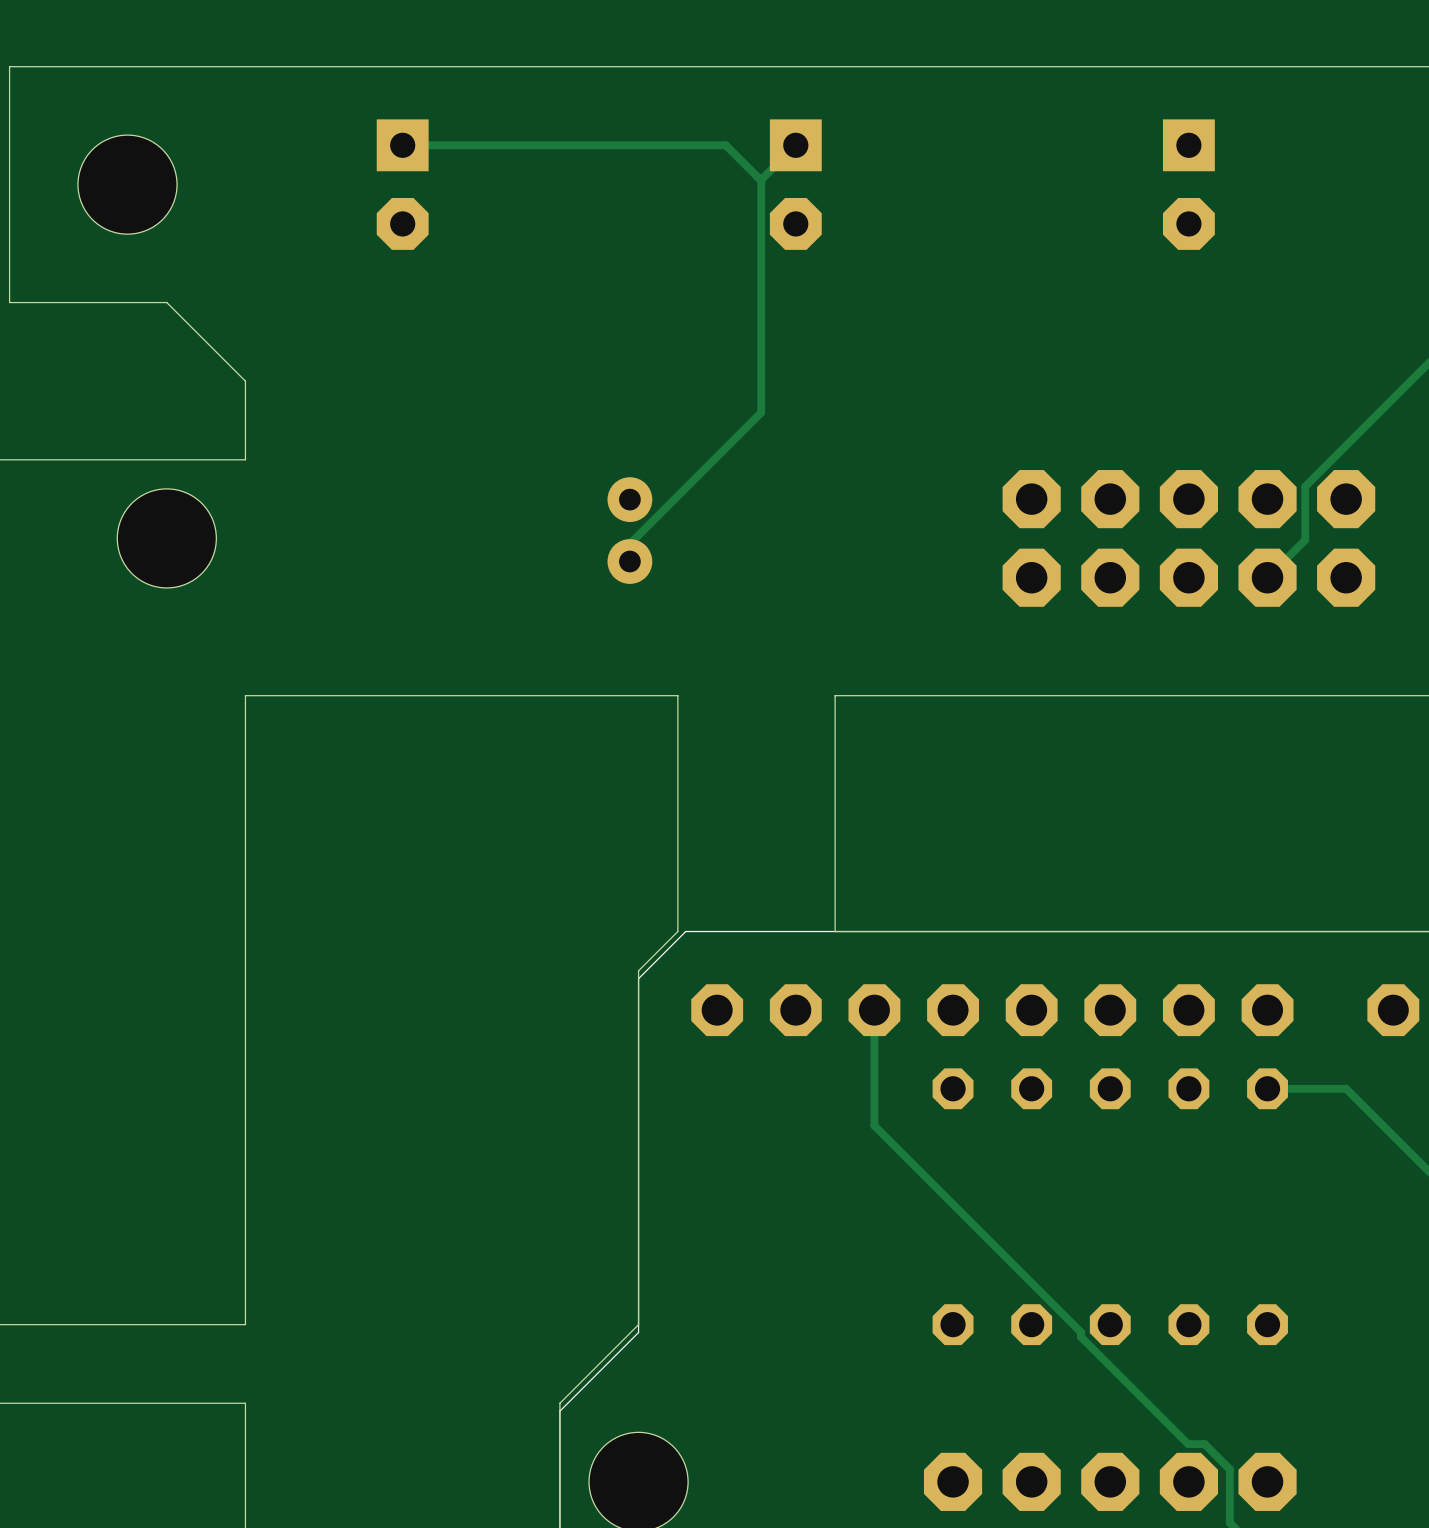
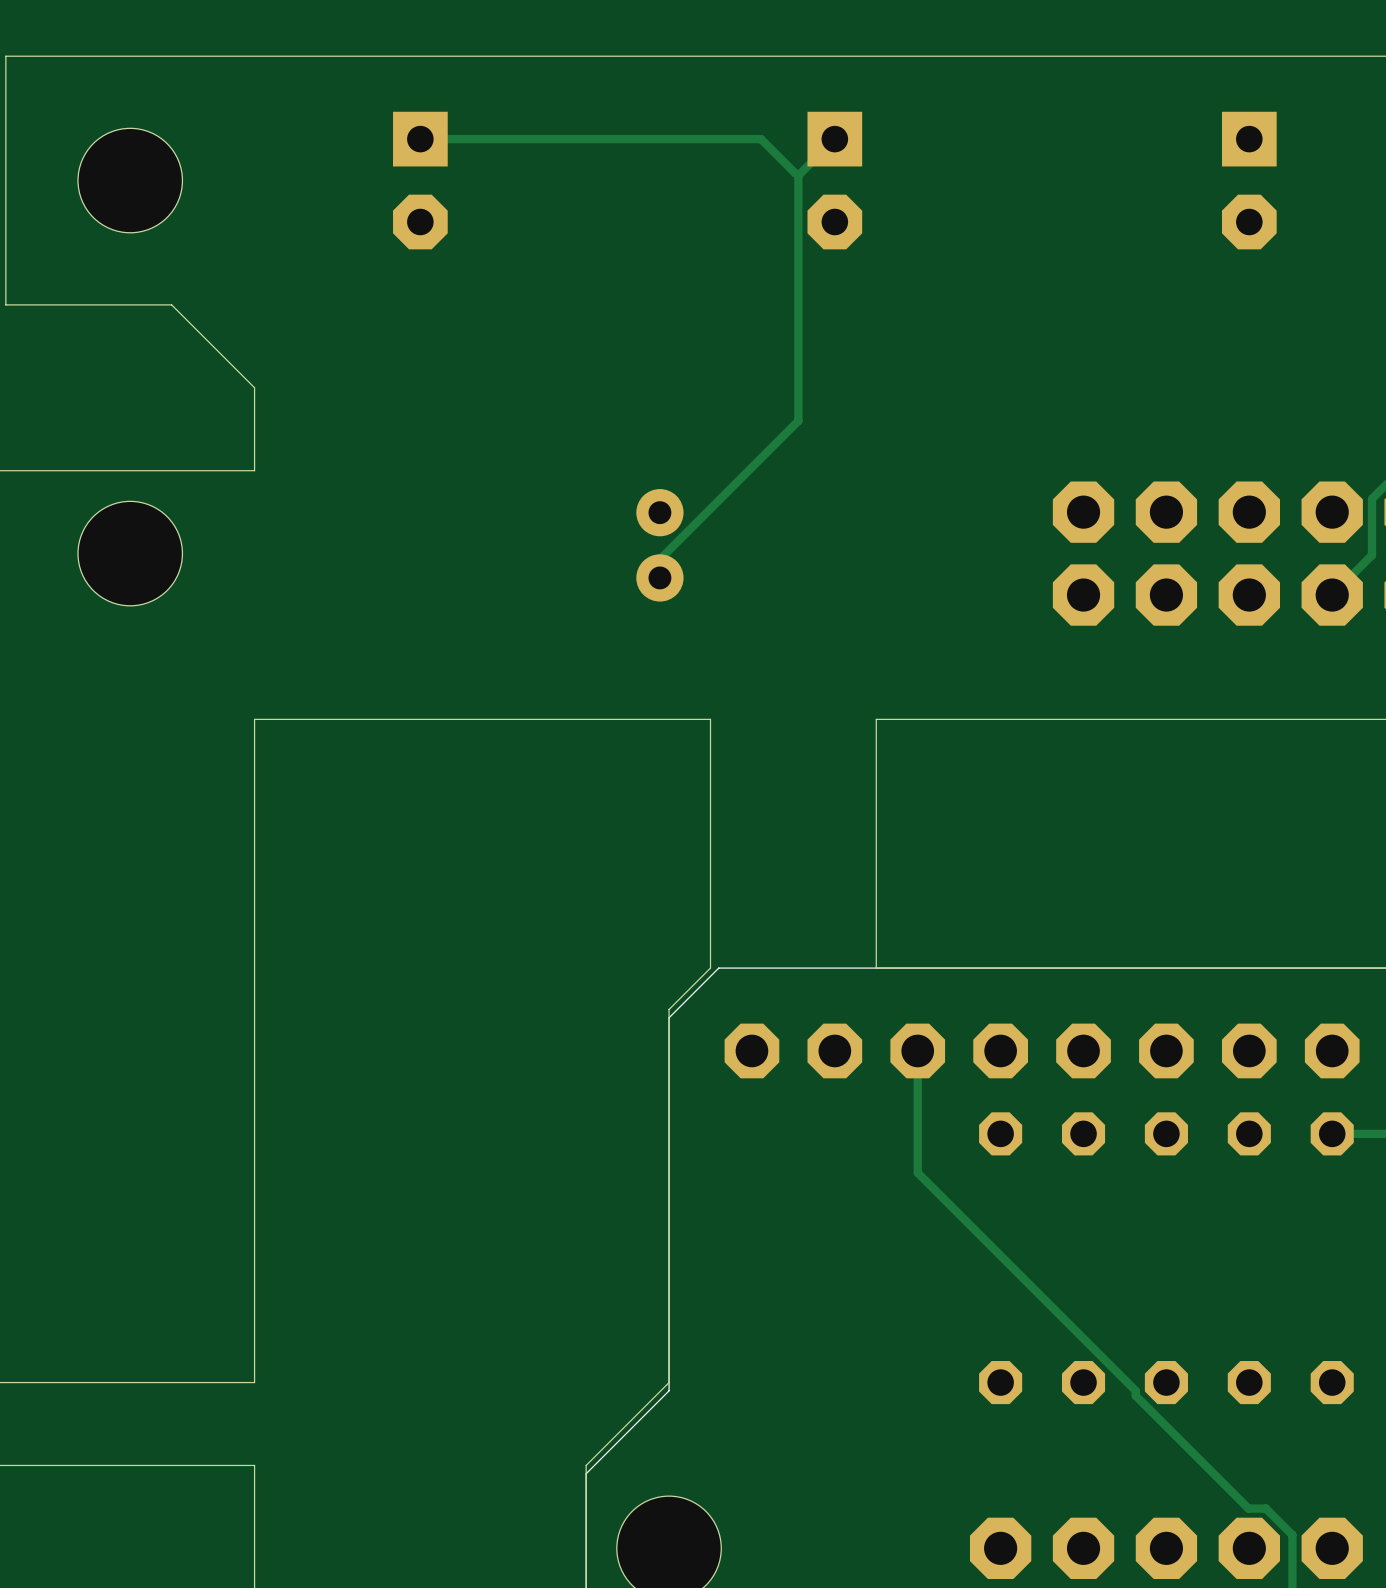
hole position: (166, 538) -> (130, 553)

